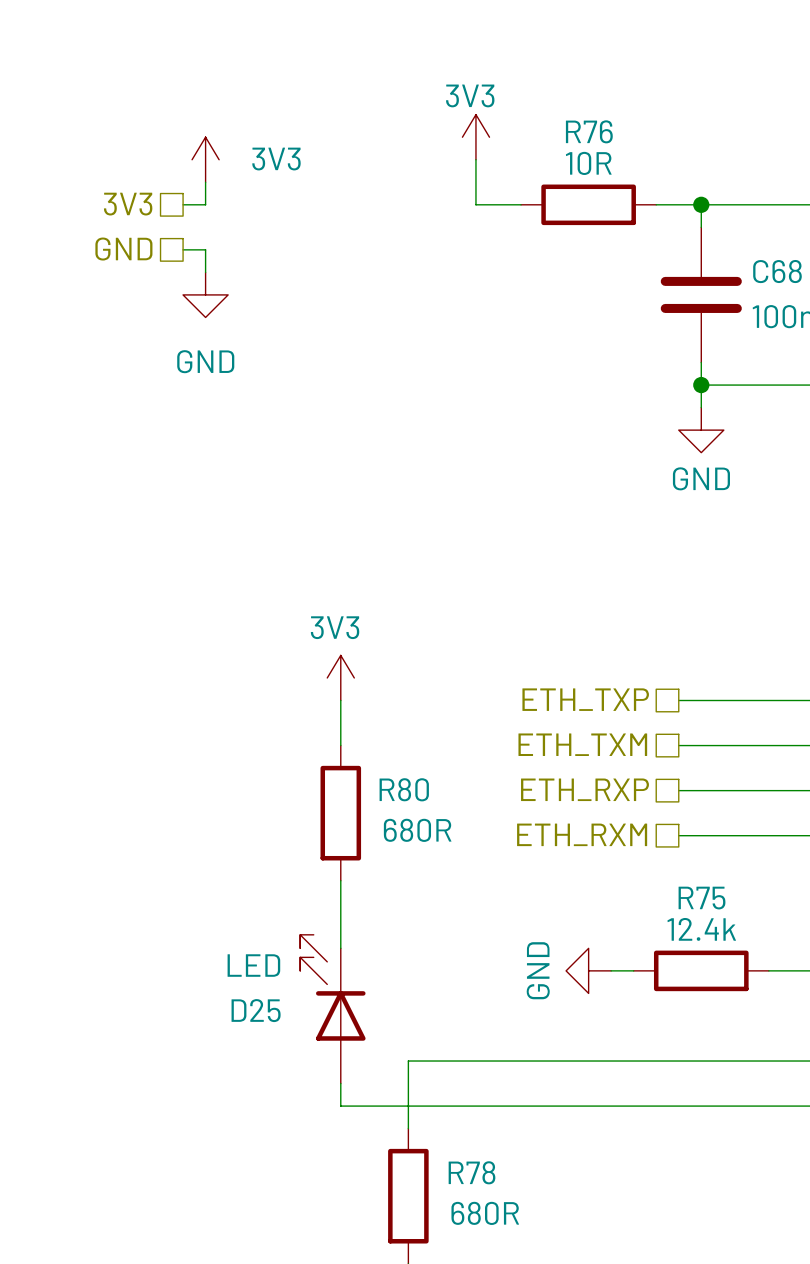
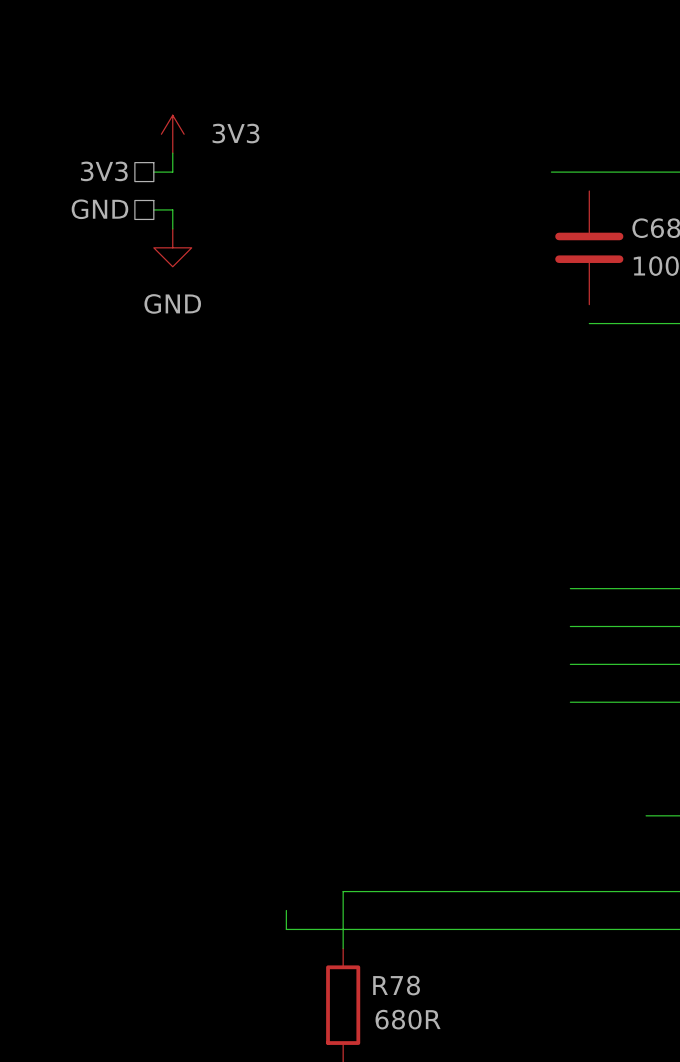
power symbol: 3V3 (475, 137) -> none
wire: (475, 159) (475, 204) (521, 204) -> none
R76: 10R (588, 204) -> none
wire: (701, 204) (701, 227) -> none
junction: (701, 204) -> none
wire: (701, 362) (701, 407) -> none
junction: (701, 385) -> none
power symbol: GND (701, 430) -> none
power symbol: 3V3 (340, 677) -> none
hierarchical label: ETH_TXP (585, 699) -> none
wire: (340, 700) (340, 745) -> none
hierarchical label: ETH_TXM (582, 744) -> none
hierarchical label: ETH_RXP (584, 789) -> none
R80: 680R (340, 813) -> none
hierarchical label: ETH_RXM (582, 834) -> none
wire: (340, 880) (340, 948) -> none
power symbol: GND (588, 970) -> none
wire: (611, 970) (633, 970) -> none
R75: 12.4k (701, 970) -> none
D25: LED (332, 1009) -> none

